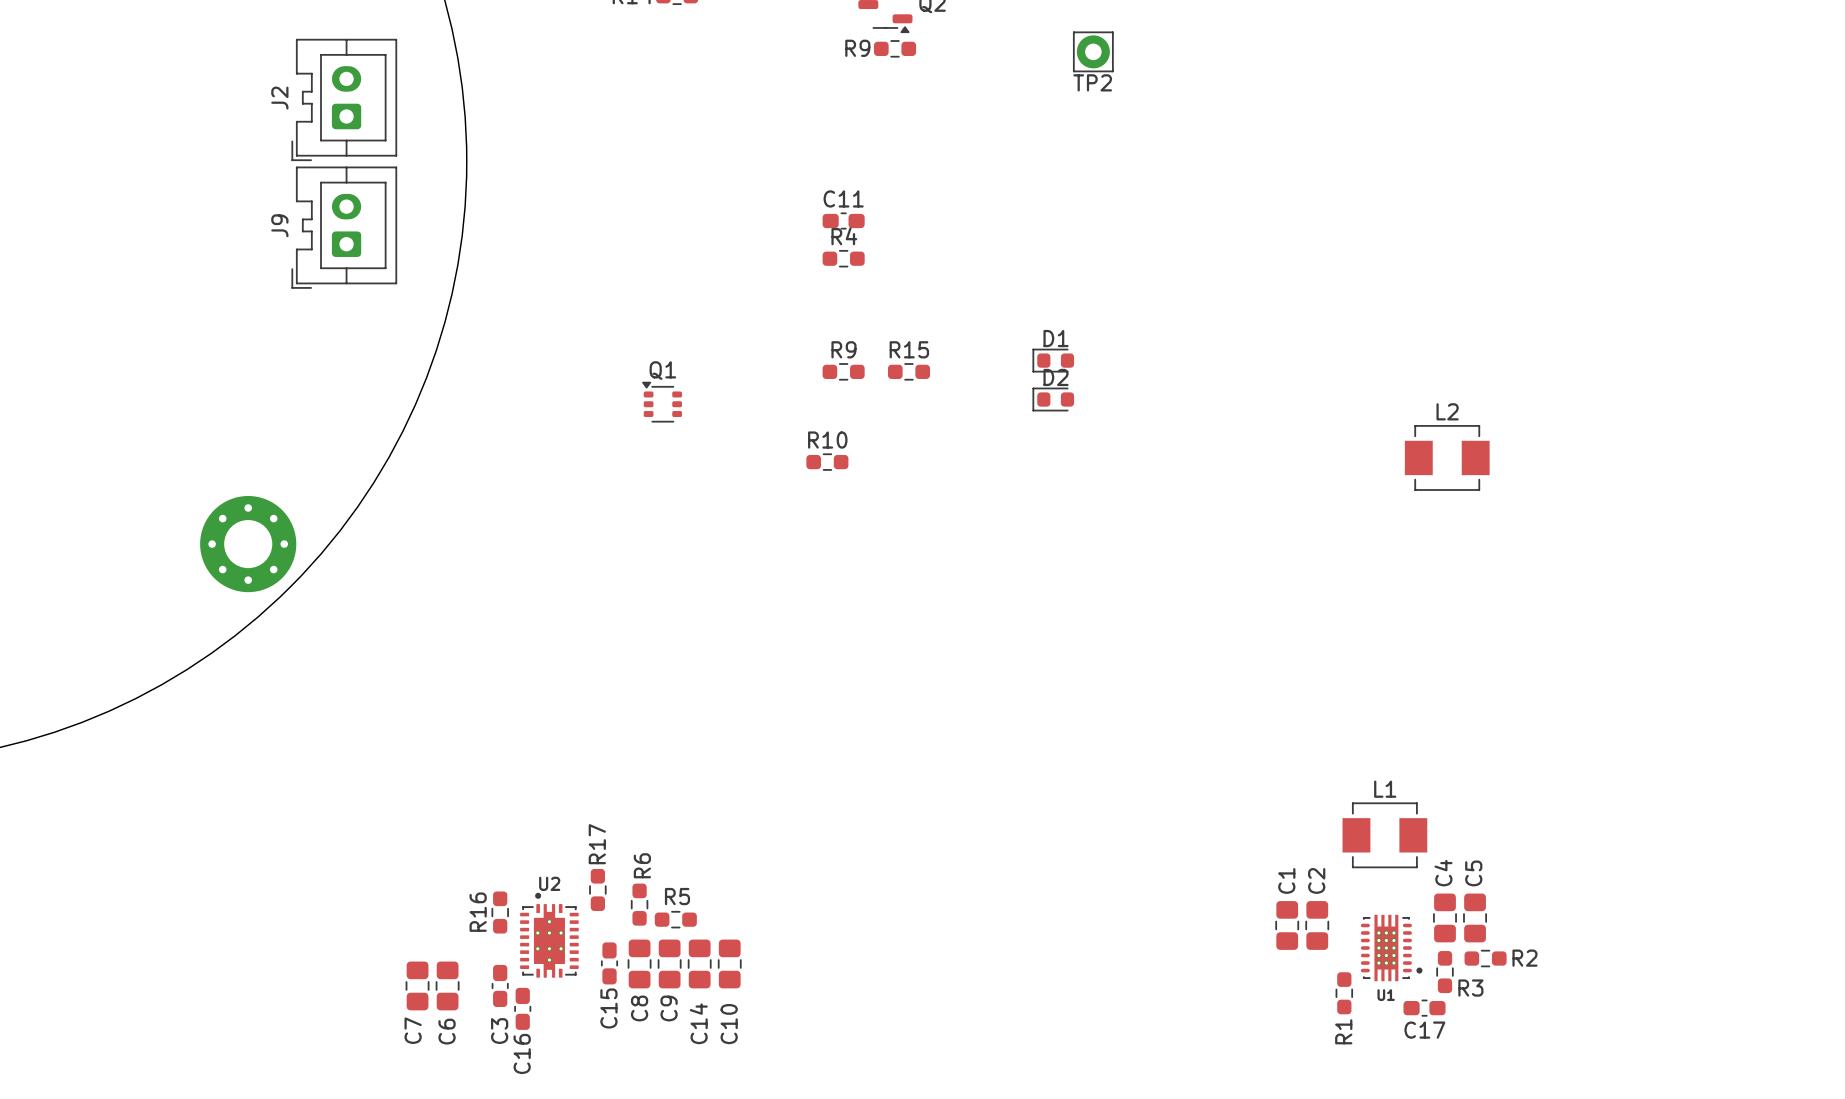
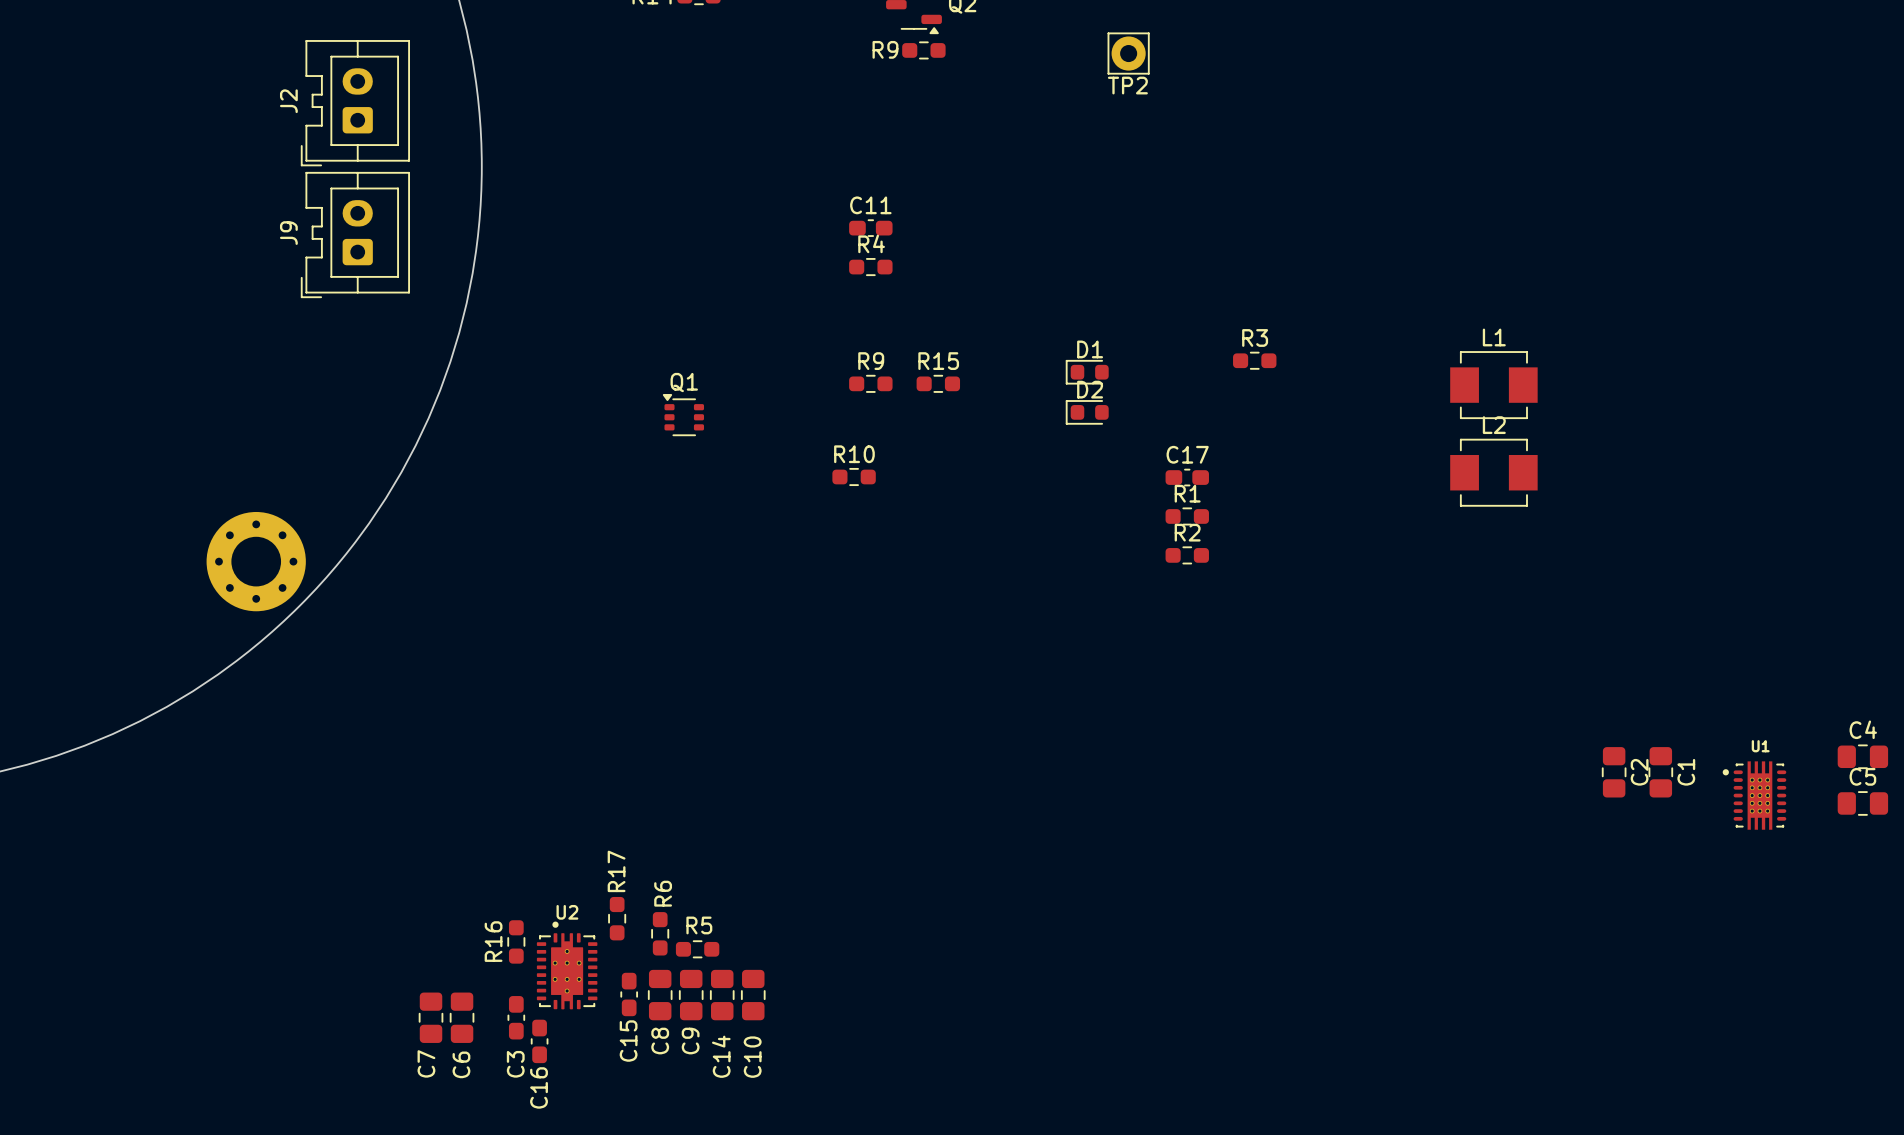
L1 position: (1384, 835) -> (1493, 385)
C1 name position: C1 (1286, 880) -> C1 (1686, 772)
C2 name position: C2 (1316, 880) -> C2 (1639, 772)
C4 rotation: 0° (1444, 917) -> 90° clockwise (1862, 756)
C4 position: (1444, 917) -> (1862, 756)
C5 rotation: 0° (1475, 917) -> 90° clockwise (1862, 803)
C5 position: (1475, 917) -> (1862, 803)
C1 position: (1287, 925) -> (1660, 772)
C2 position: (1317, 925) -> (1614, 772)
U1 rotation: 0° (1391, 948) -> 180° (1754, 795)
U1 position: (1391, 948) -> (1754, 795)
R2 position: (1485, 958) -> (1187, 555)
R2 name position: R2 (1524, 958) -> R2 (1187, 532)
R3 rotation: 0° (1444, 972) -> 90° clockwise (1254, 360)
R3 position: (1444, 972) -> (1254, 360)
R3 name position: R3 (1470, 988) -> R3 (1255, 337)
R1 rotation: 0° (1344, 993) -> 90° clockwise (1187, 516)
R1 position: (1344, 993) -> (1187, 516)
C17 position: (1424, 1008) -> (1187, 477)
C17 name position: C17 (1424, 1030) -> C17 (1187, 454)
R1 name position: R1 (1343, 1031) -> R1 (1187, 493)

